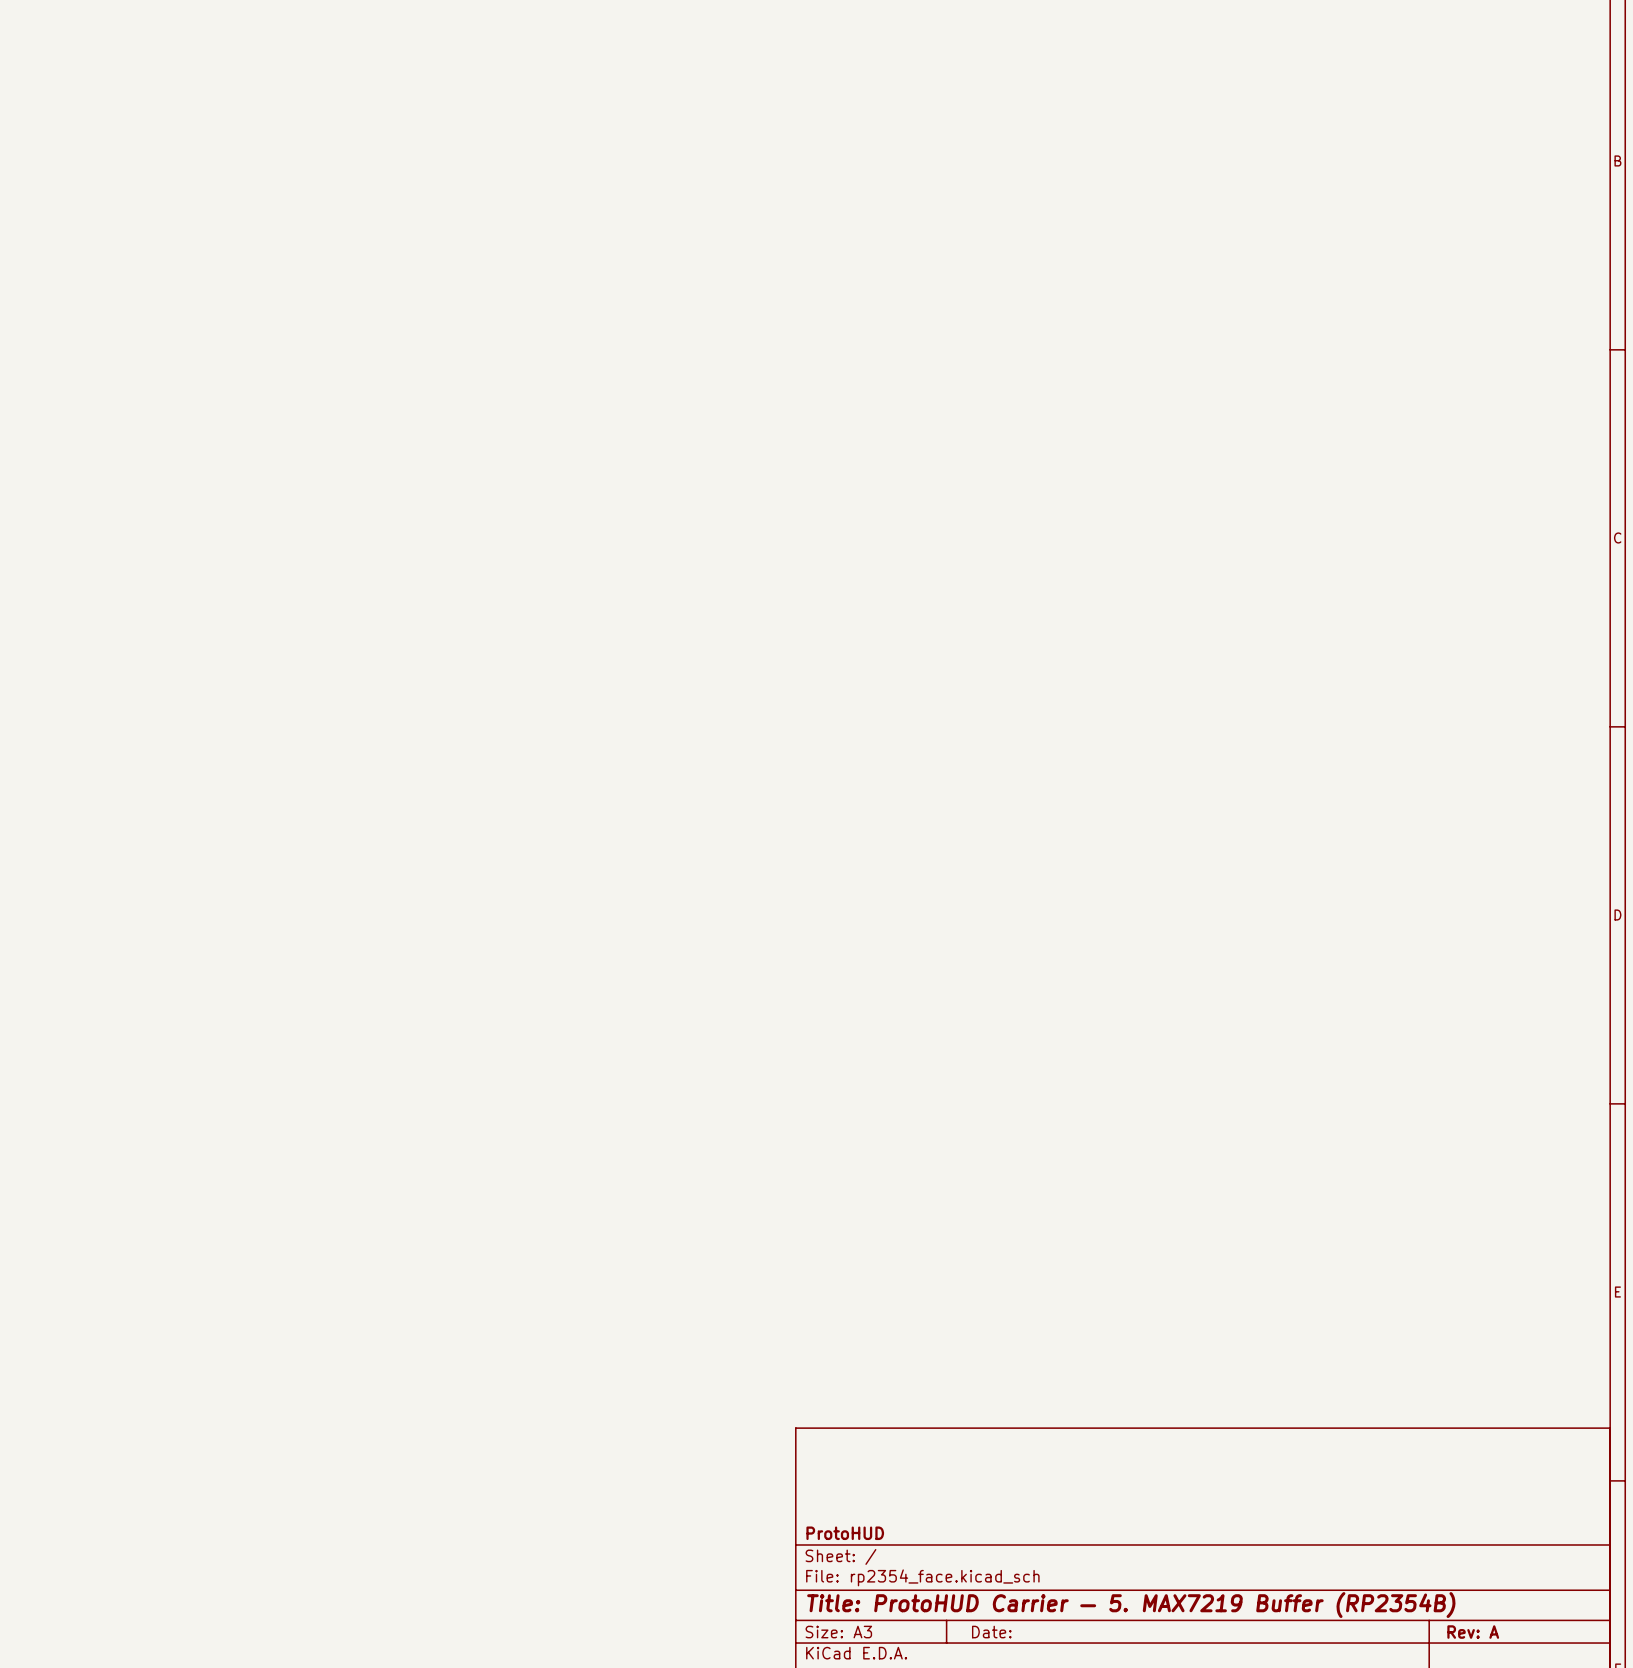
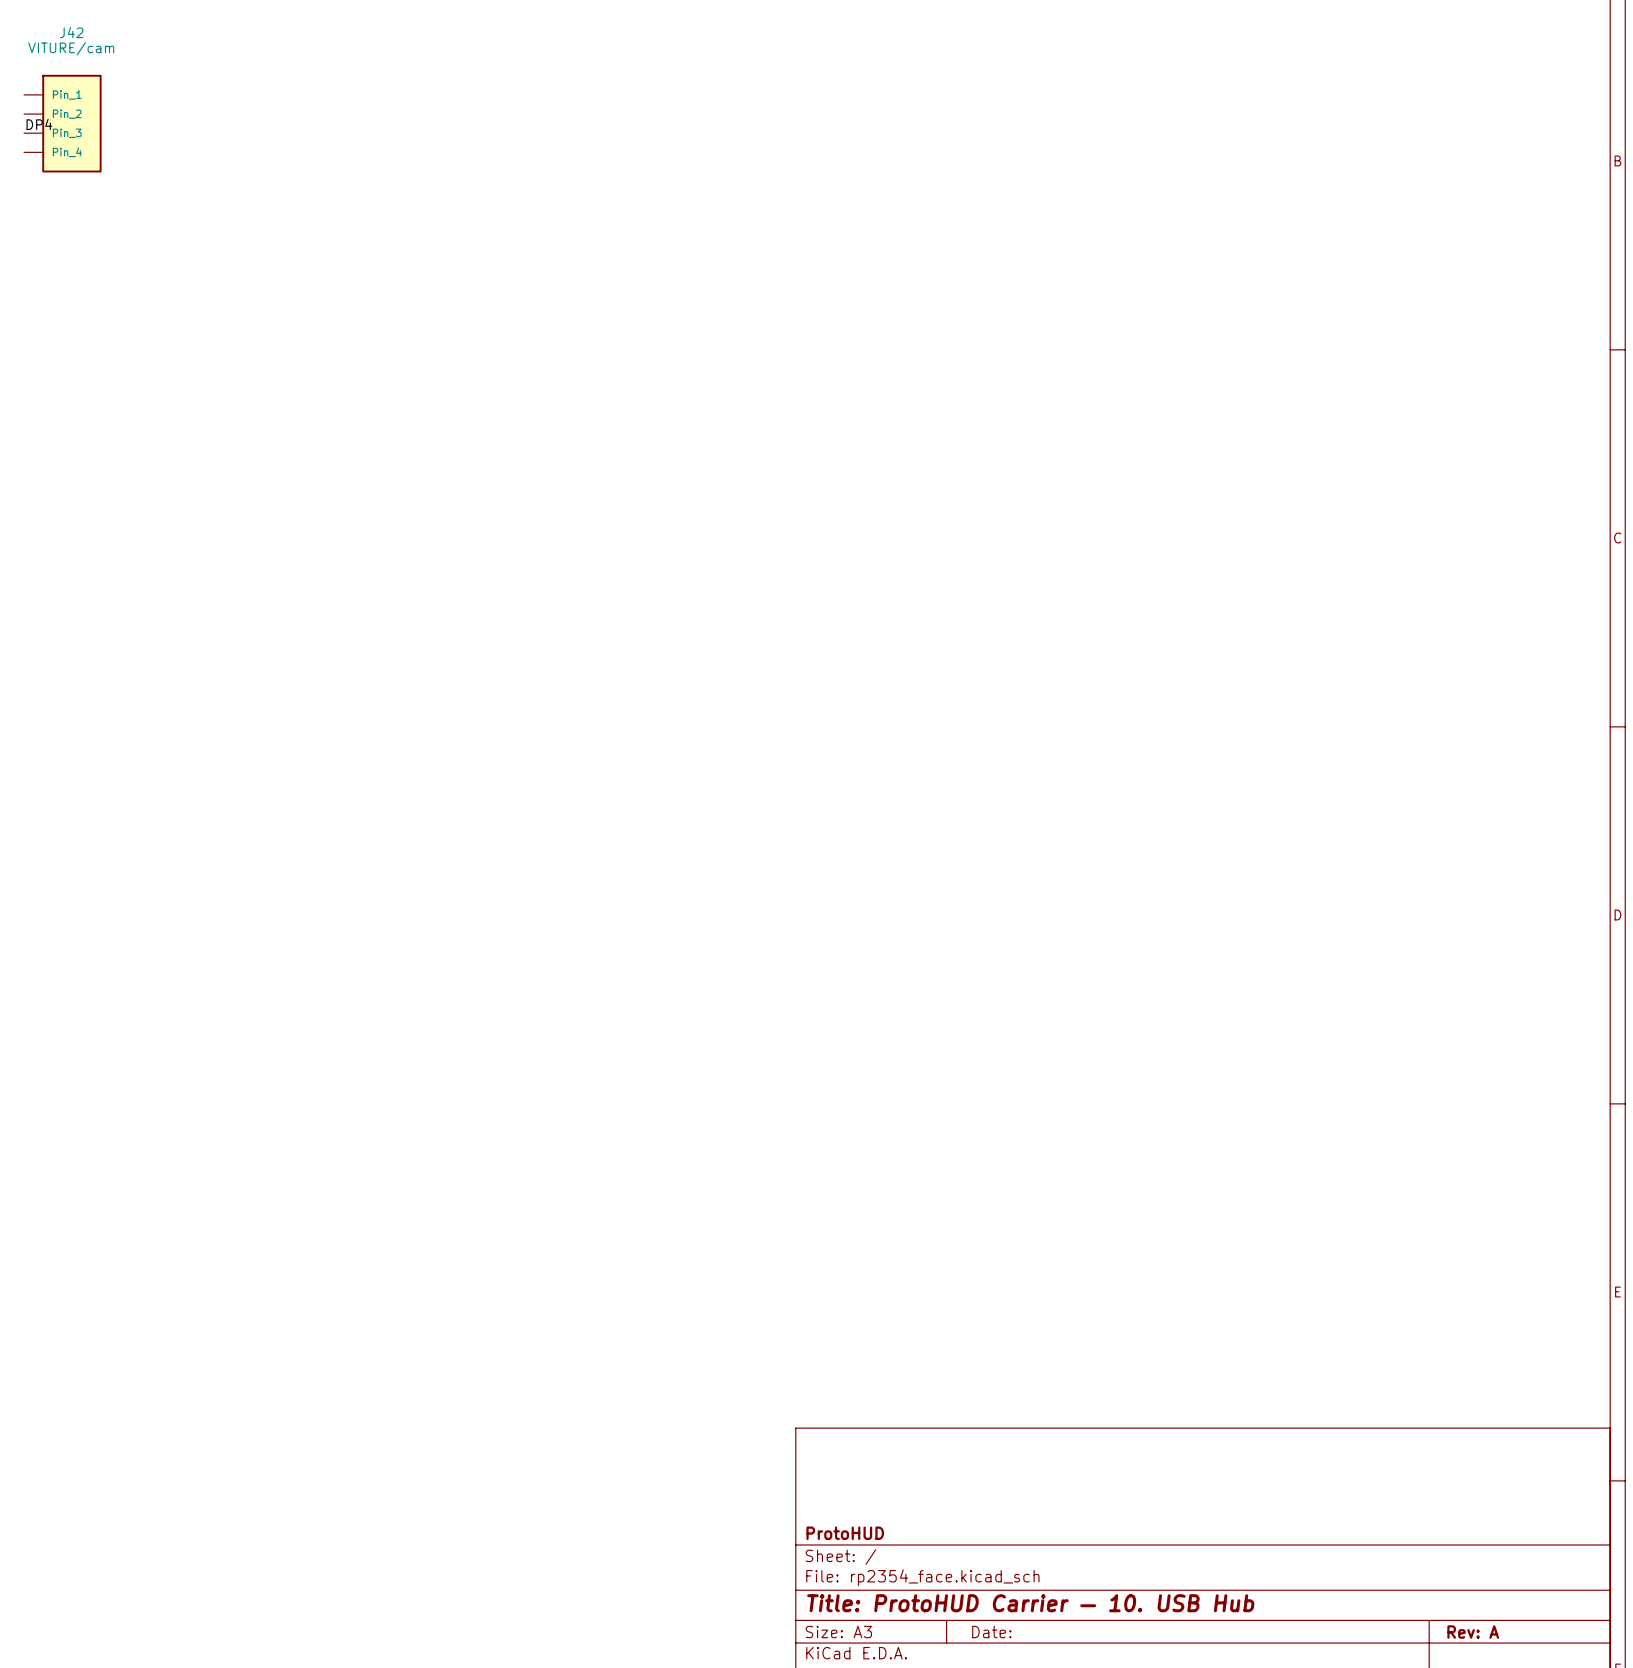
J42: none -> VITURE/cam (62, 123)
label: none -> DP4 (39, 124)
title block: Title: ProtoHUD Carrier — 5. MAX7219 Buffer (RP2354B) (1131, 1605) -> Title: ProtoHUD Carrier — 10. USB Hub (1030, 1603)

